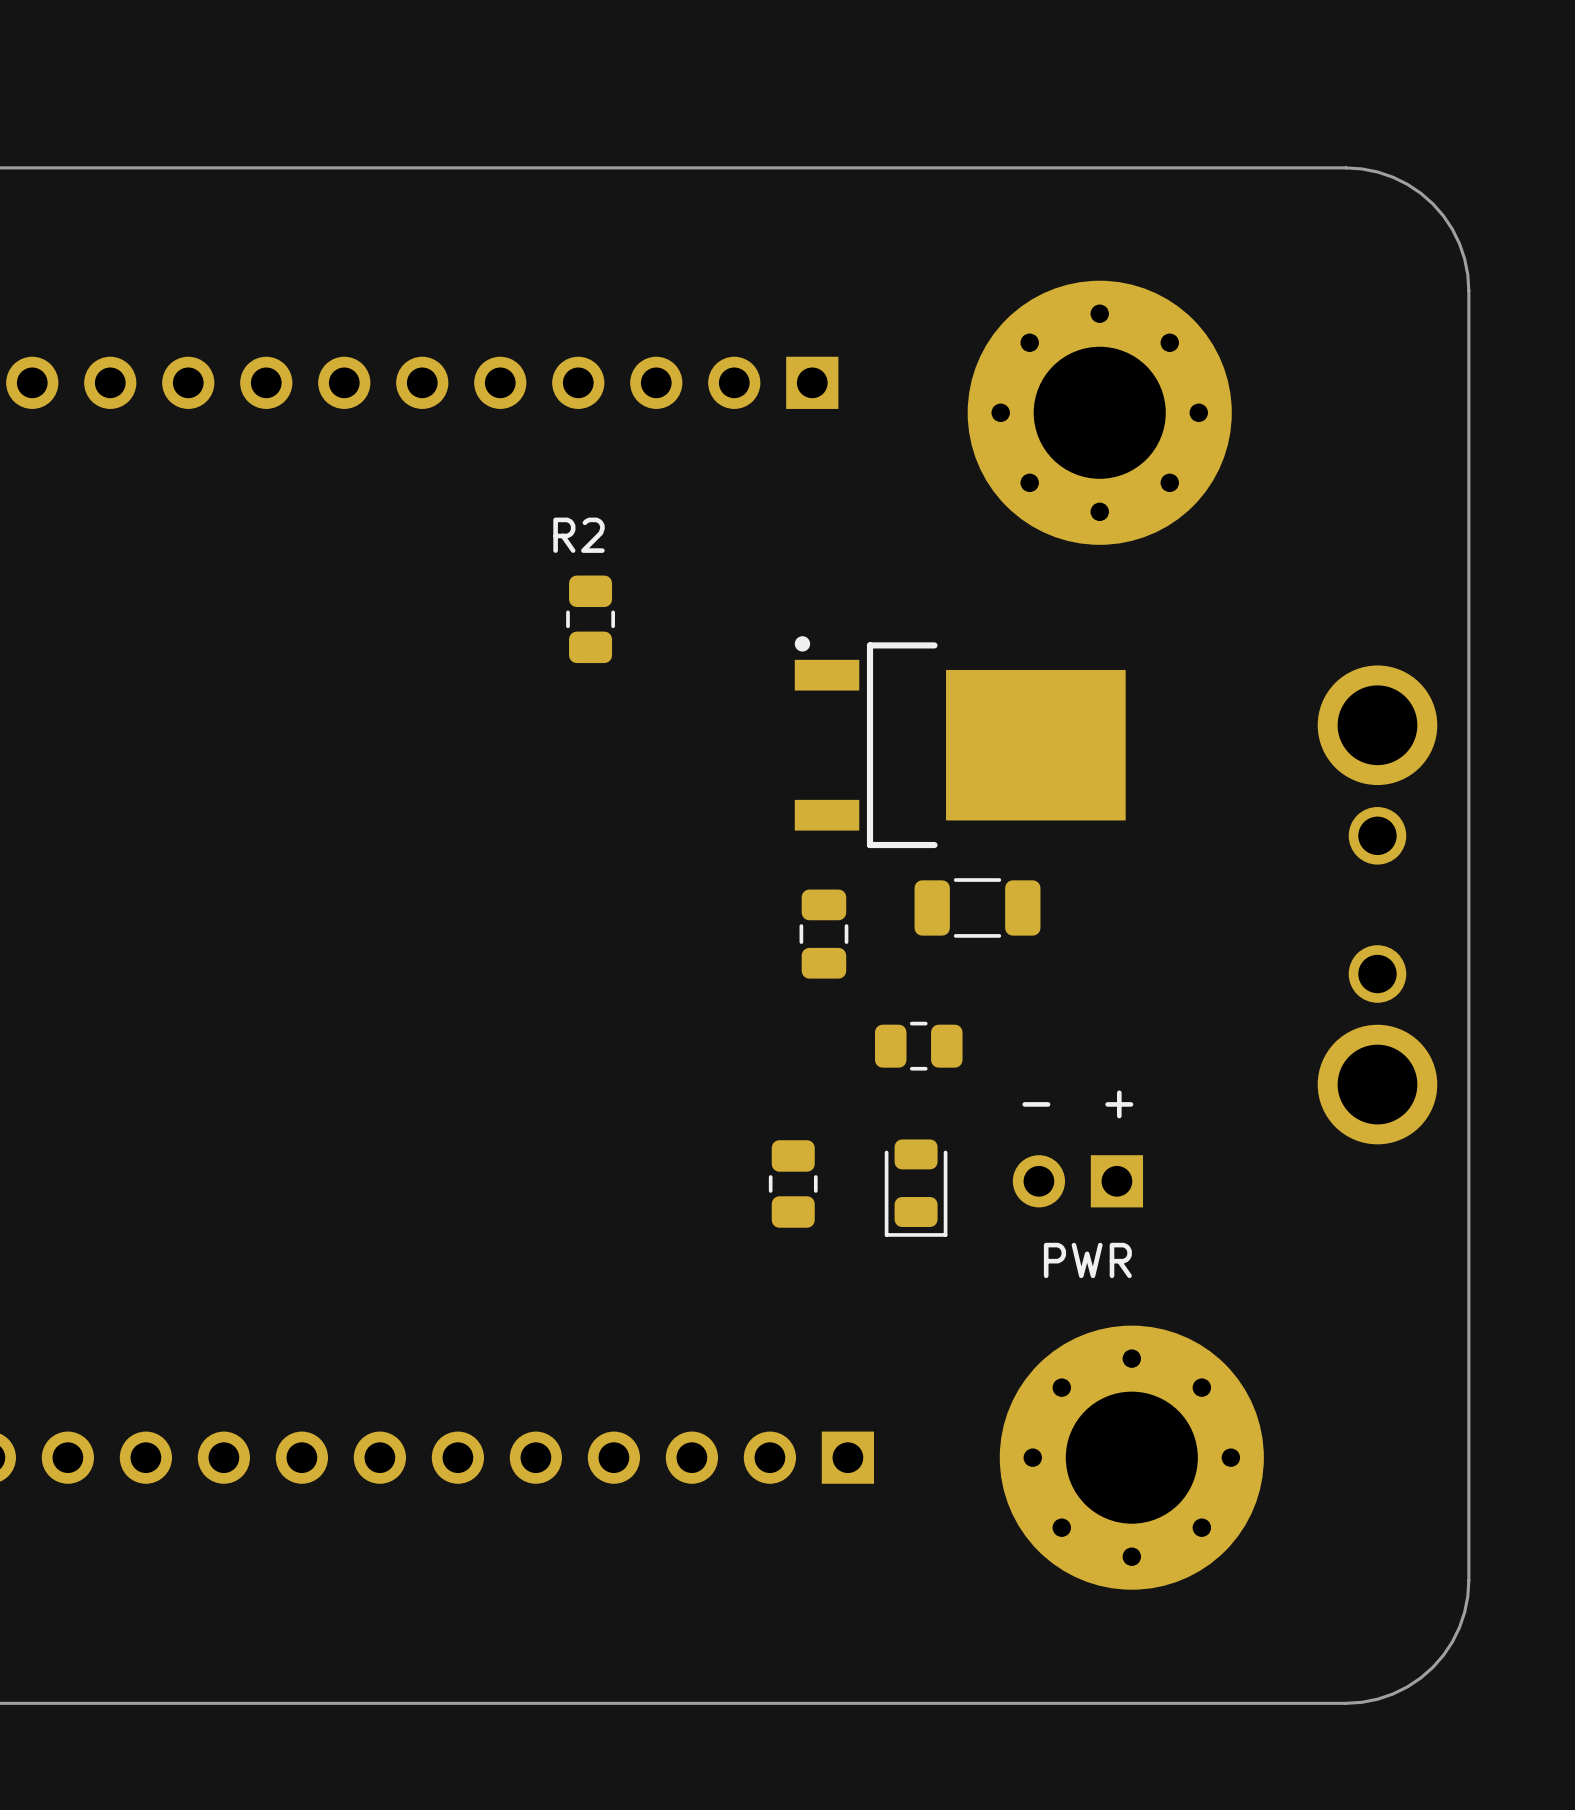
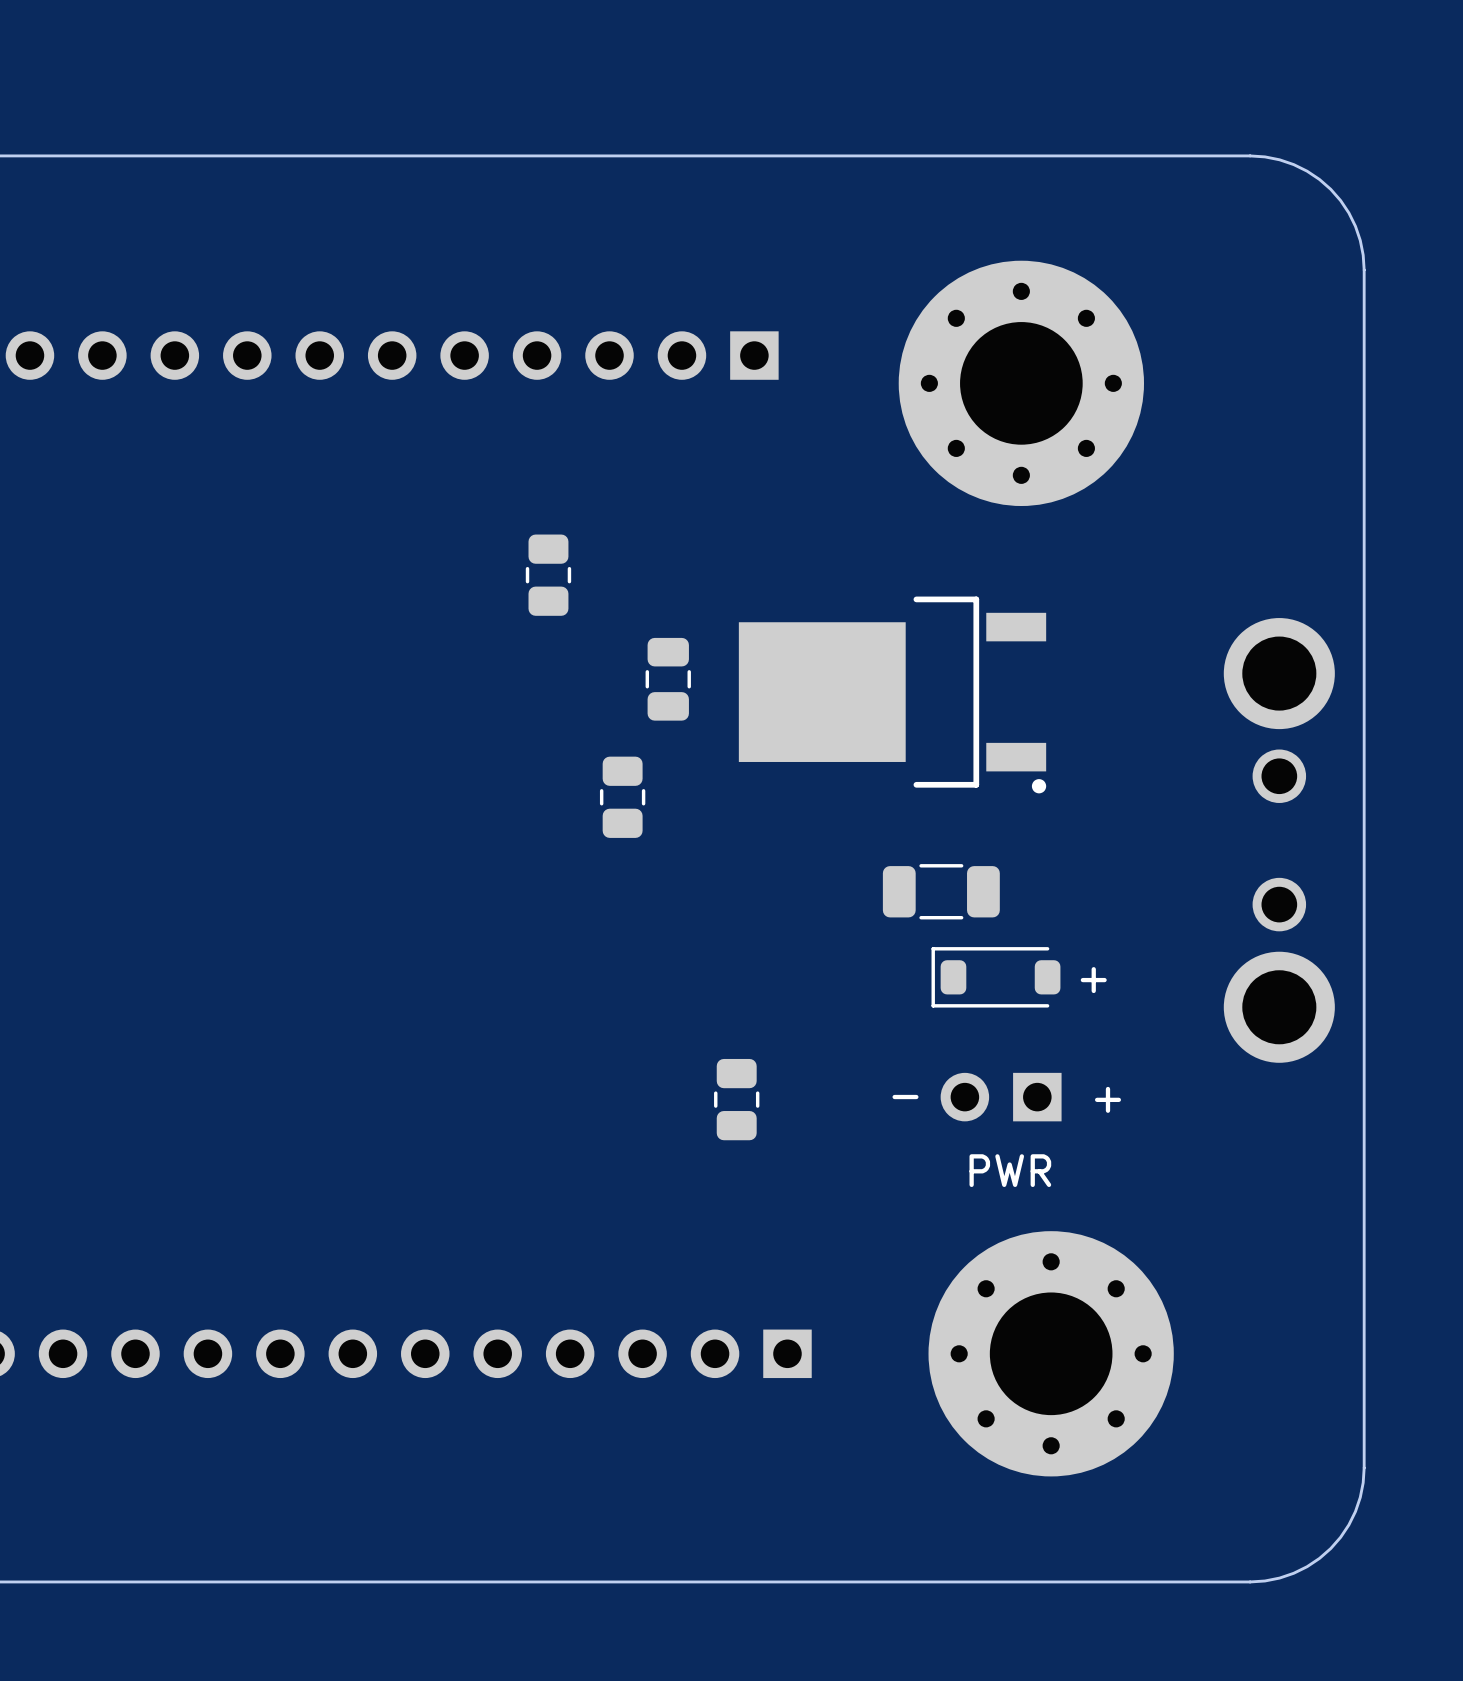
R2 name: R2 (579, 535) -> none
part rotation: 0° (960, 742) -> 180° (892, 694)
part position: (977, 907) -> (941, 891)
part position: (823, 934) -> (668, 679)
part rotation: 0° (918, 1046) -> 90° clockwise (622, 797)
part position: (918, 1046) -> (622, 797)
part: none -> (995, 977)
text: none -> + (1093, 980)
text position: - (1036, 1104) -> - (905, 1097)
text: + (1119, 1104) -> none
text: none -> + (1107, 1099)
part: (916, 1188) -> none

